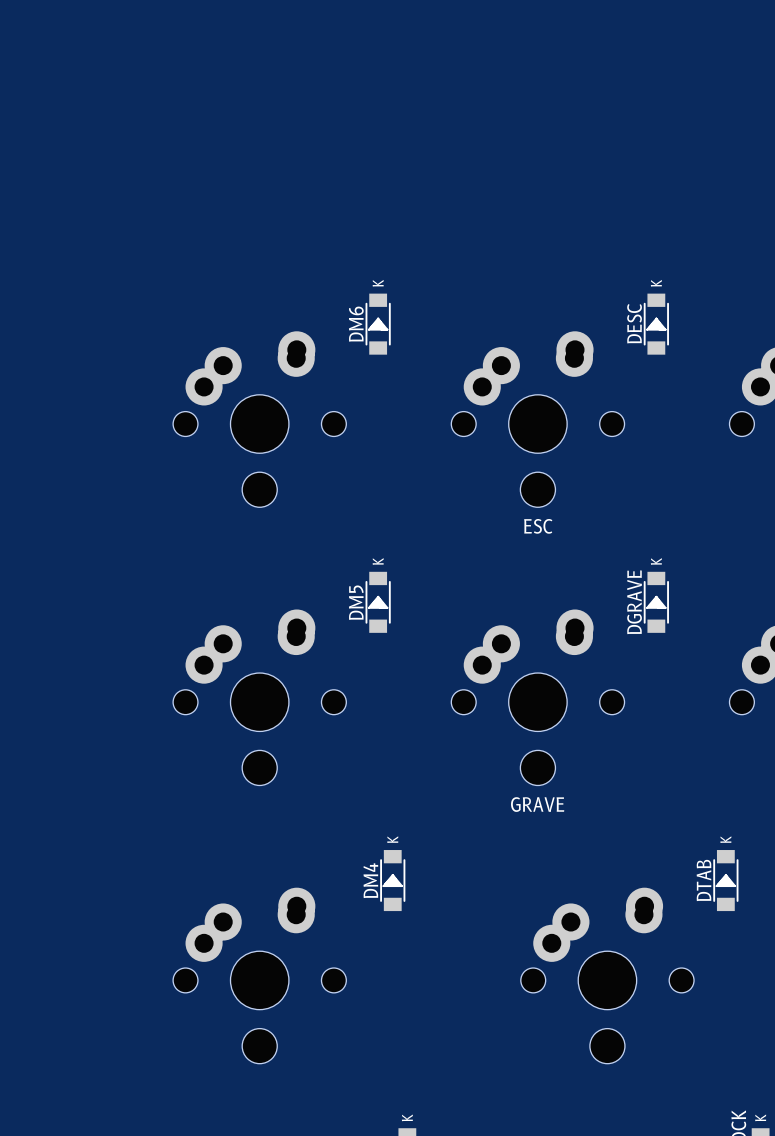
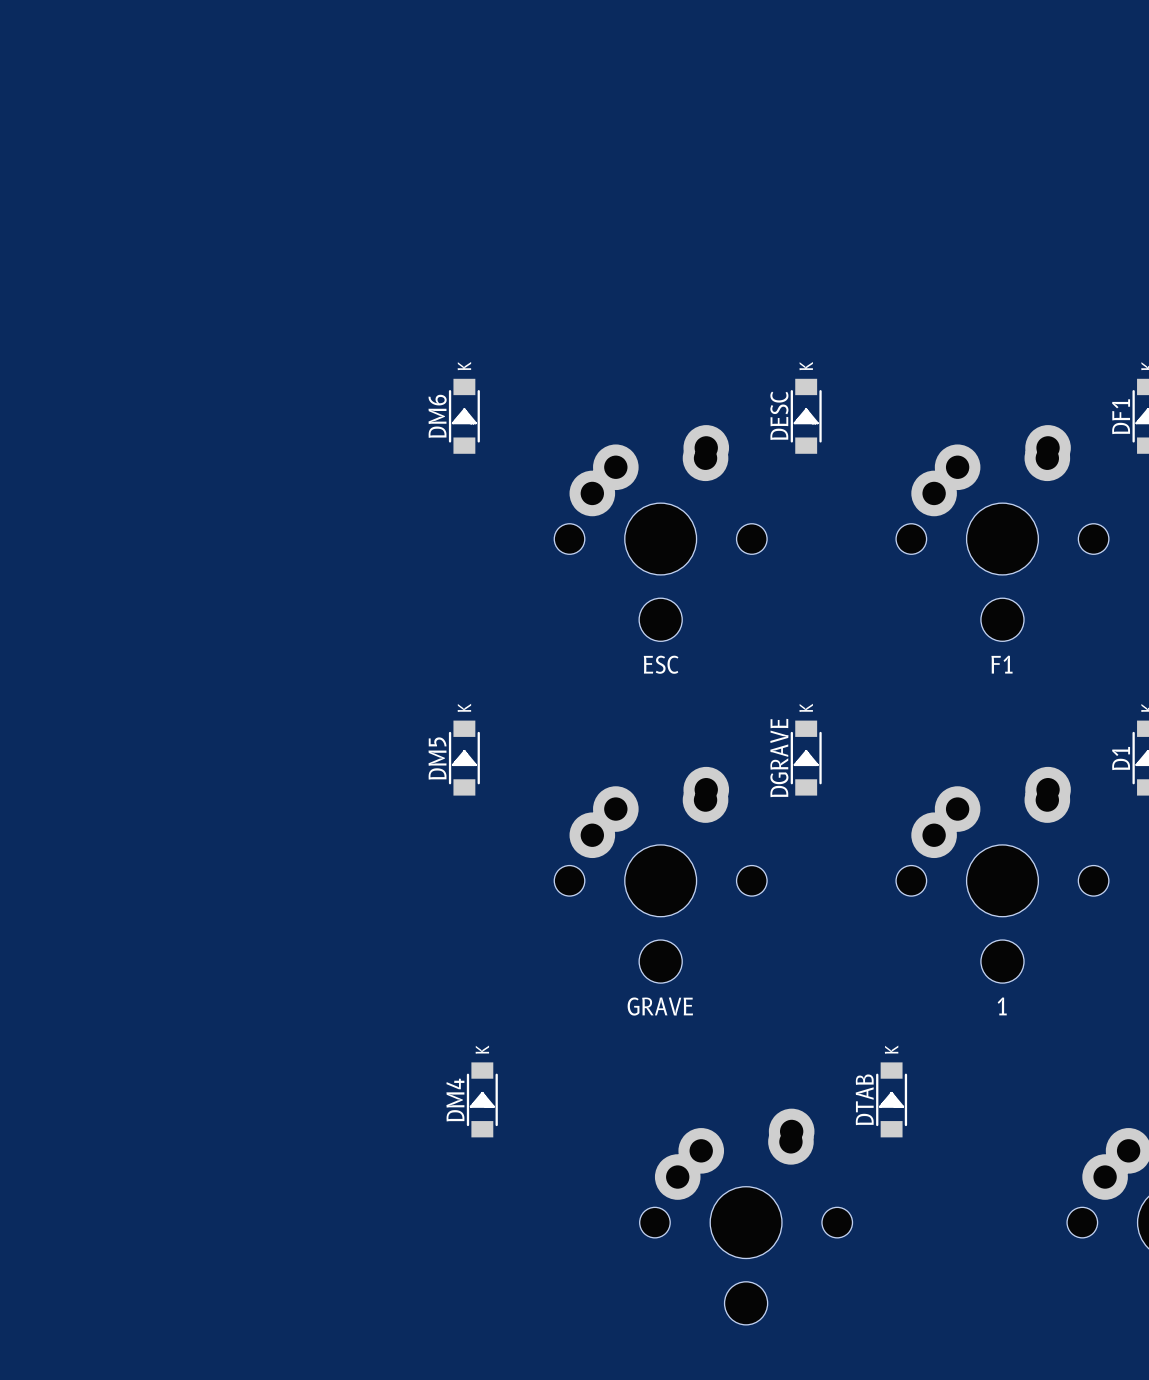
part: (259, 419) -> none
part: (259, 697) -> none
part: (259, 975) -> none

